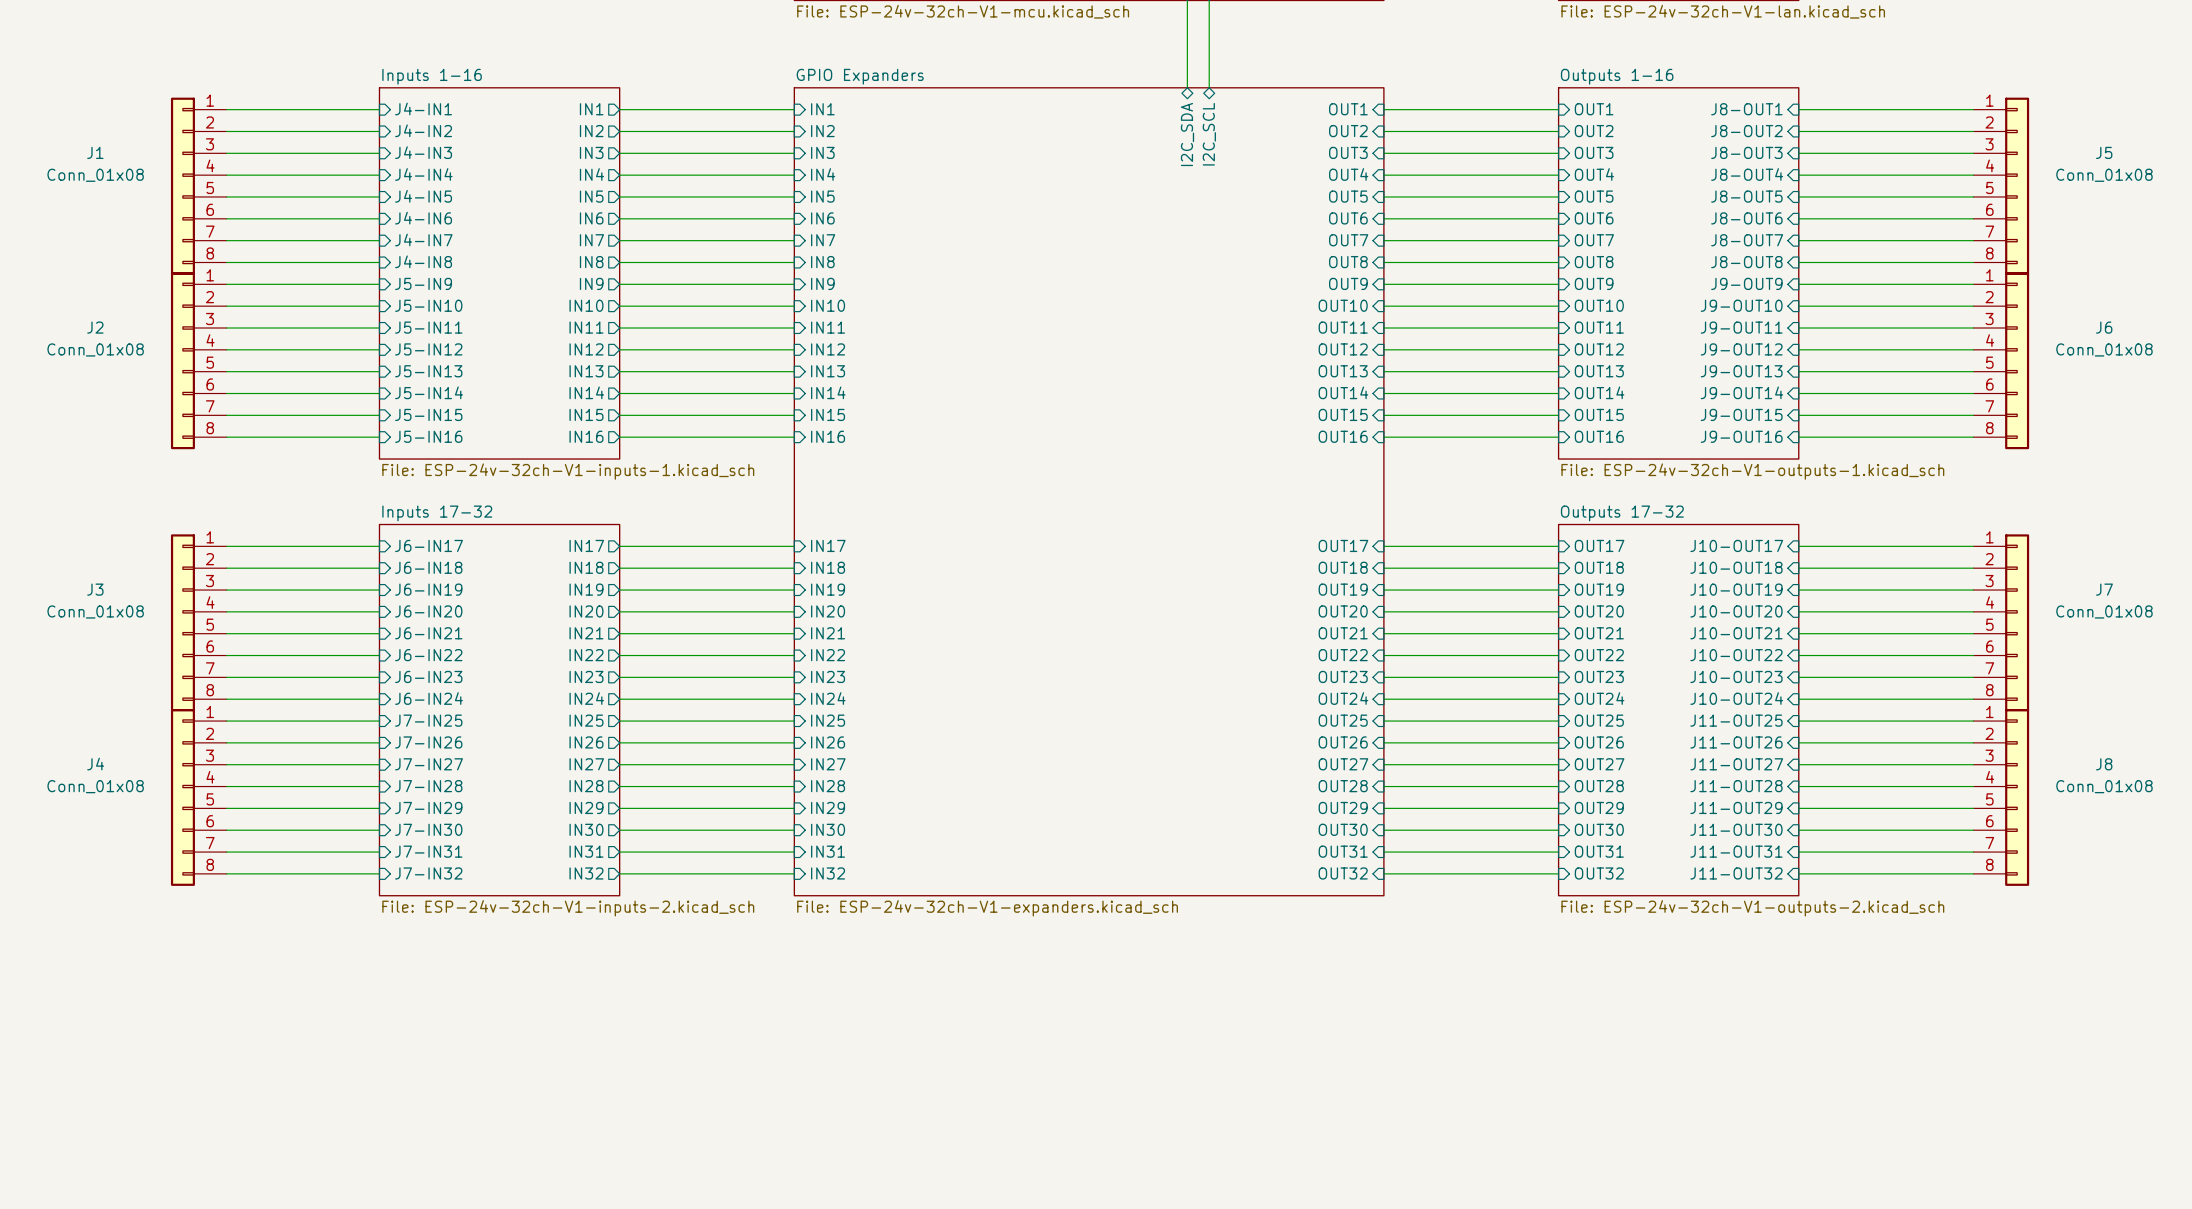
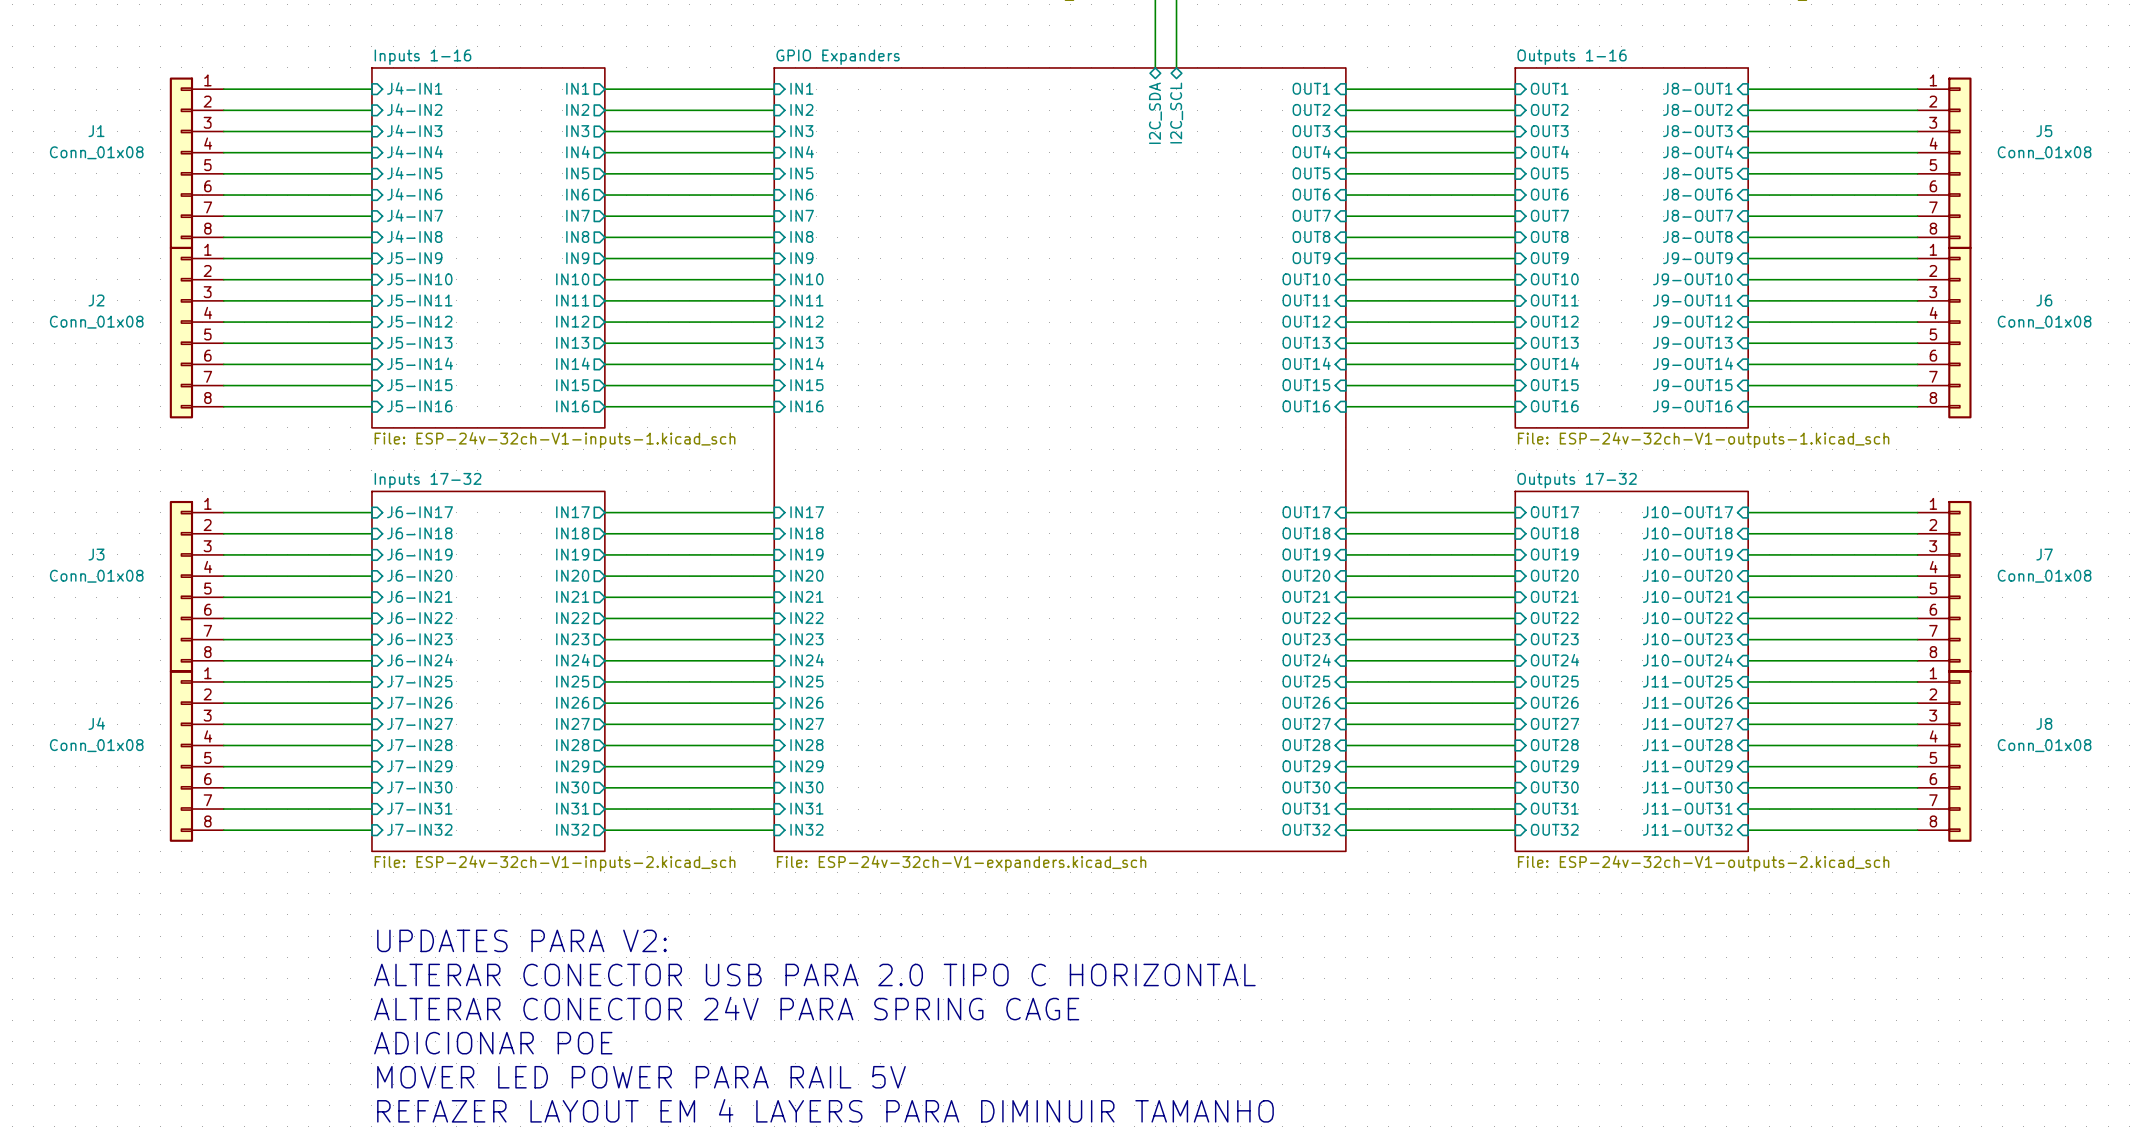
text: none -> UPDATES PARA V2: (522, 940)
text: none -> ALTERAR CONECTOR USB PARA 2.0 TIPO C HORIZONTAL (814, 974)
text: none -> ALTERAR CONECTOR 24V PARA SPRING CAGE (726, 1008)
text: none -> ADICIONAR POE (493, 1043)
text: none -> MOVER LED POWER PARA RAIL 5V (641, 1077)
text: none -> REFAZER LAYOUT EM 4 LAYERS PARA DIMINUIR TAMANHO (825, 1110)

